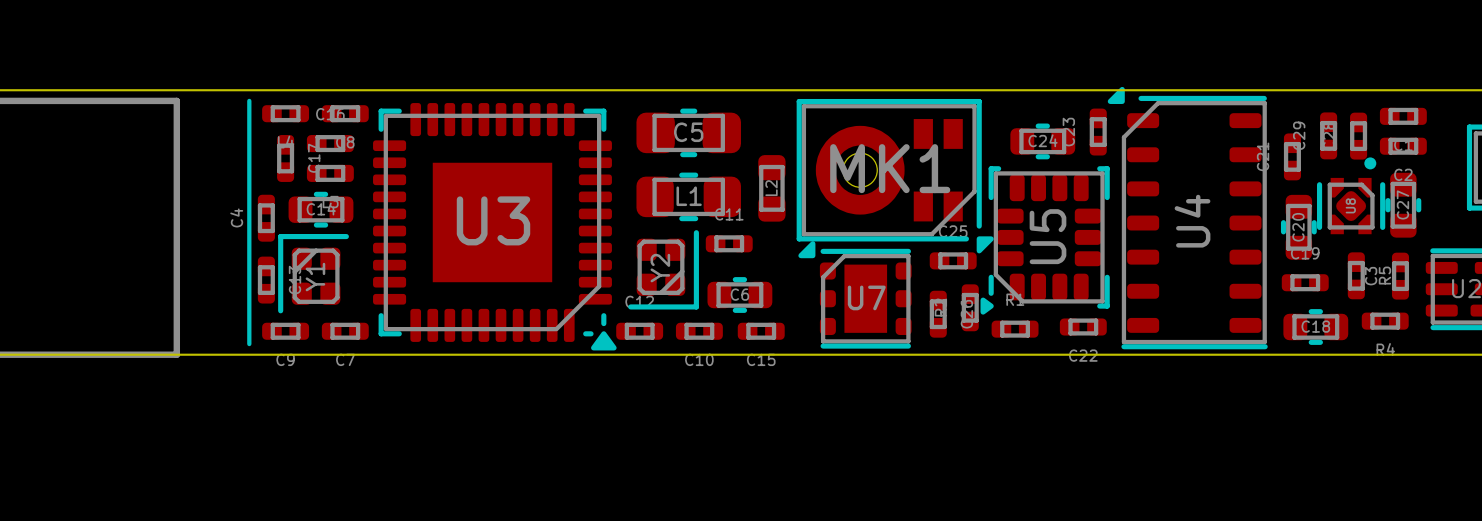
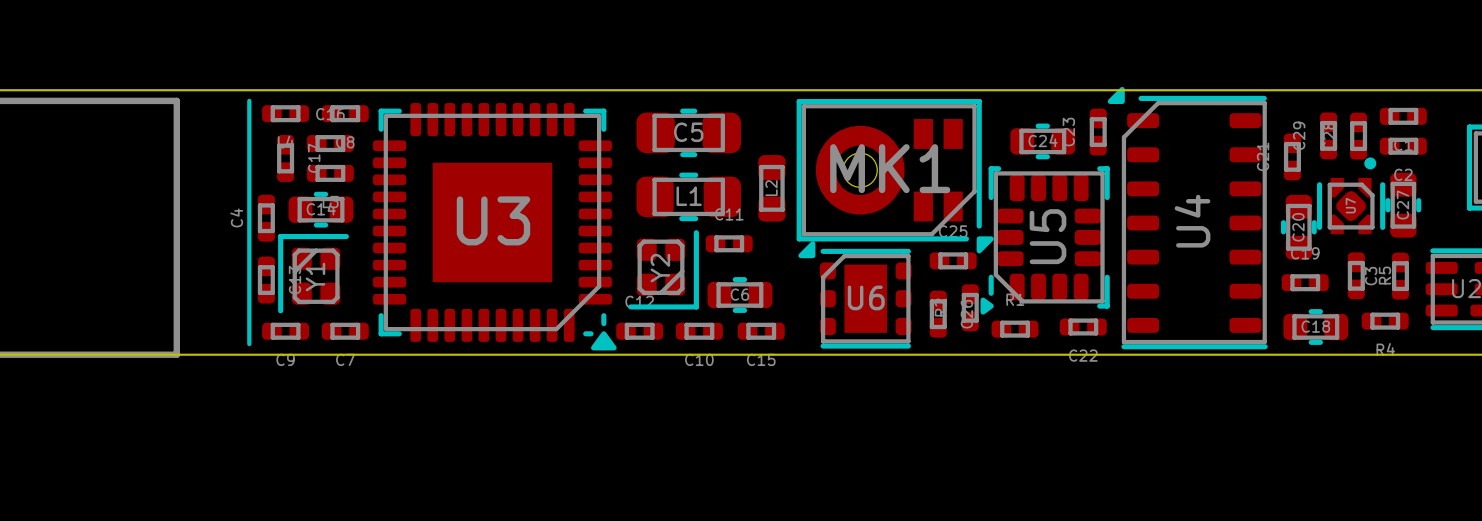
U8 name: U8 (1350, 205) -> U7 (1350, 205)
U7 name: U7 (866, 297) -> U6 (866, 297)

